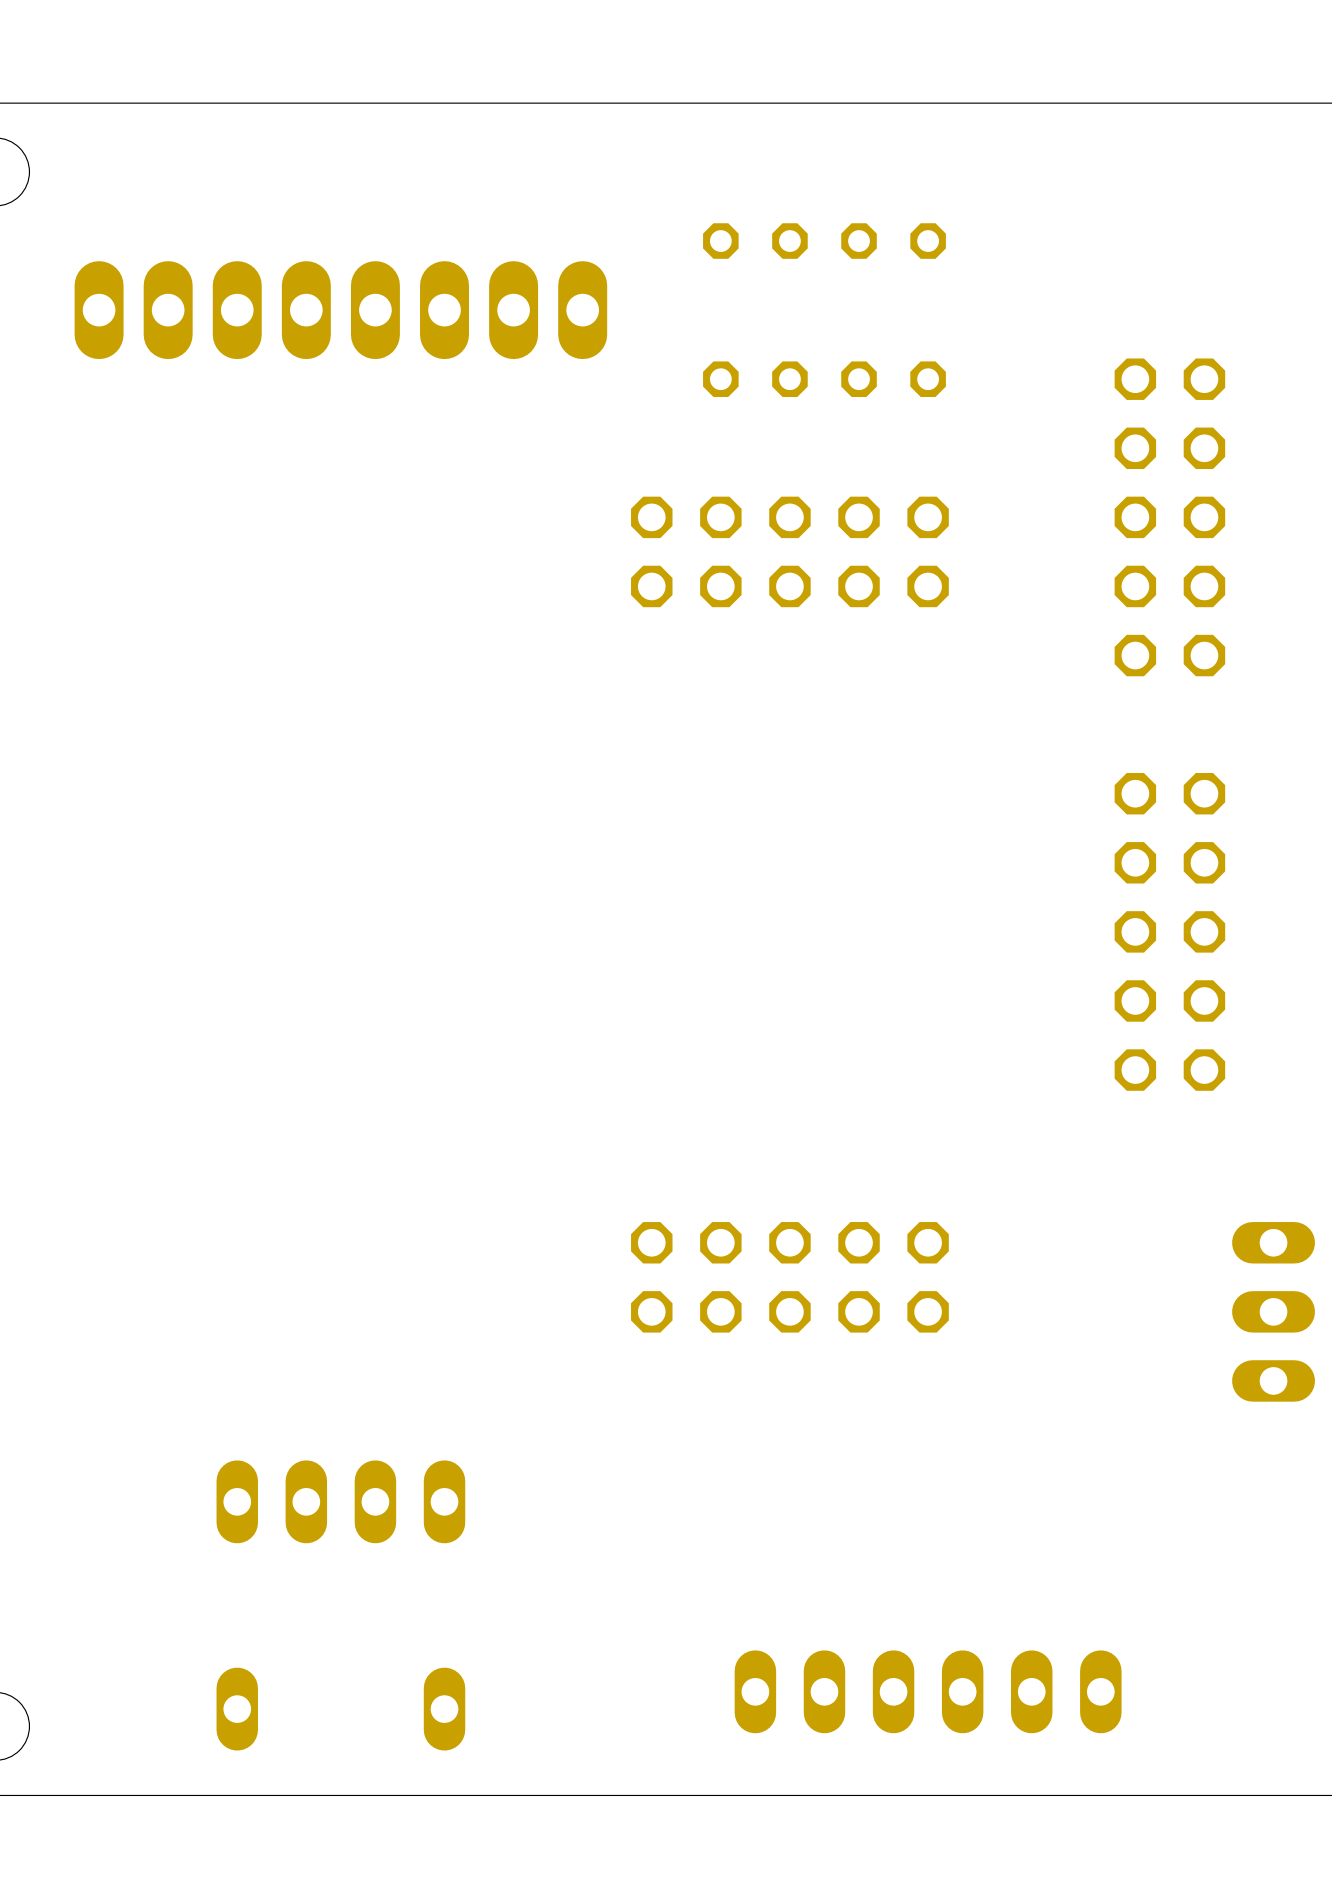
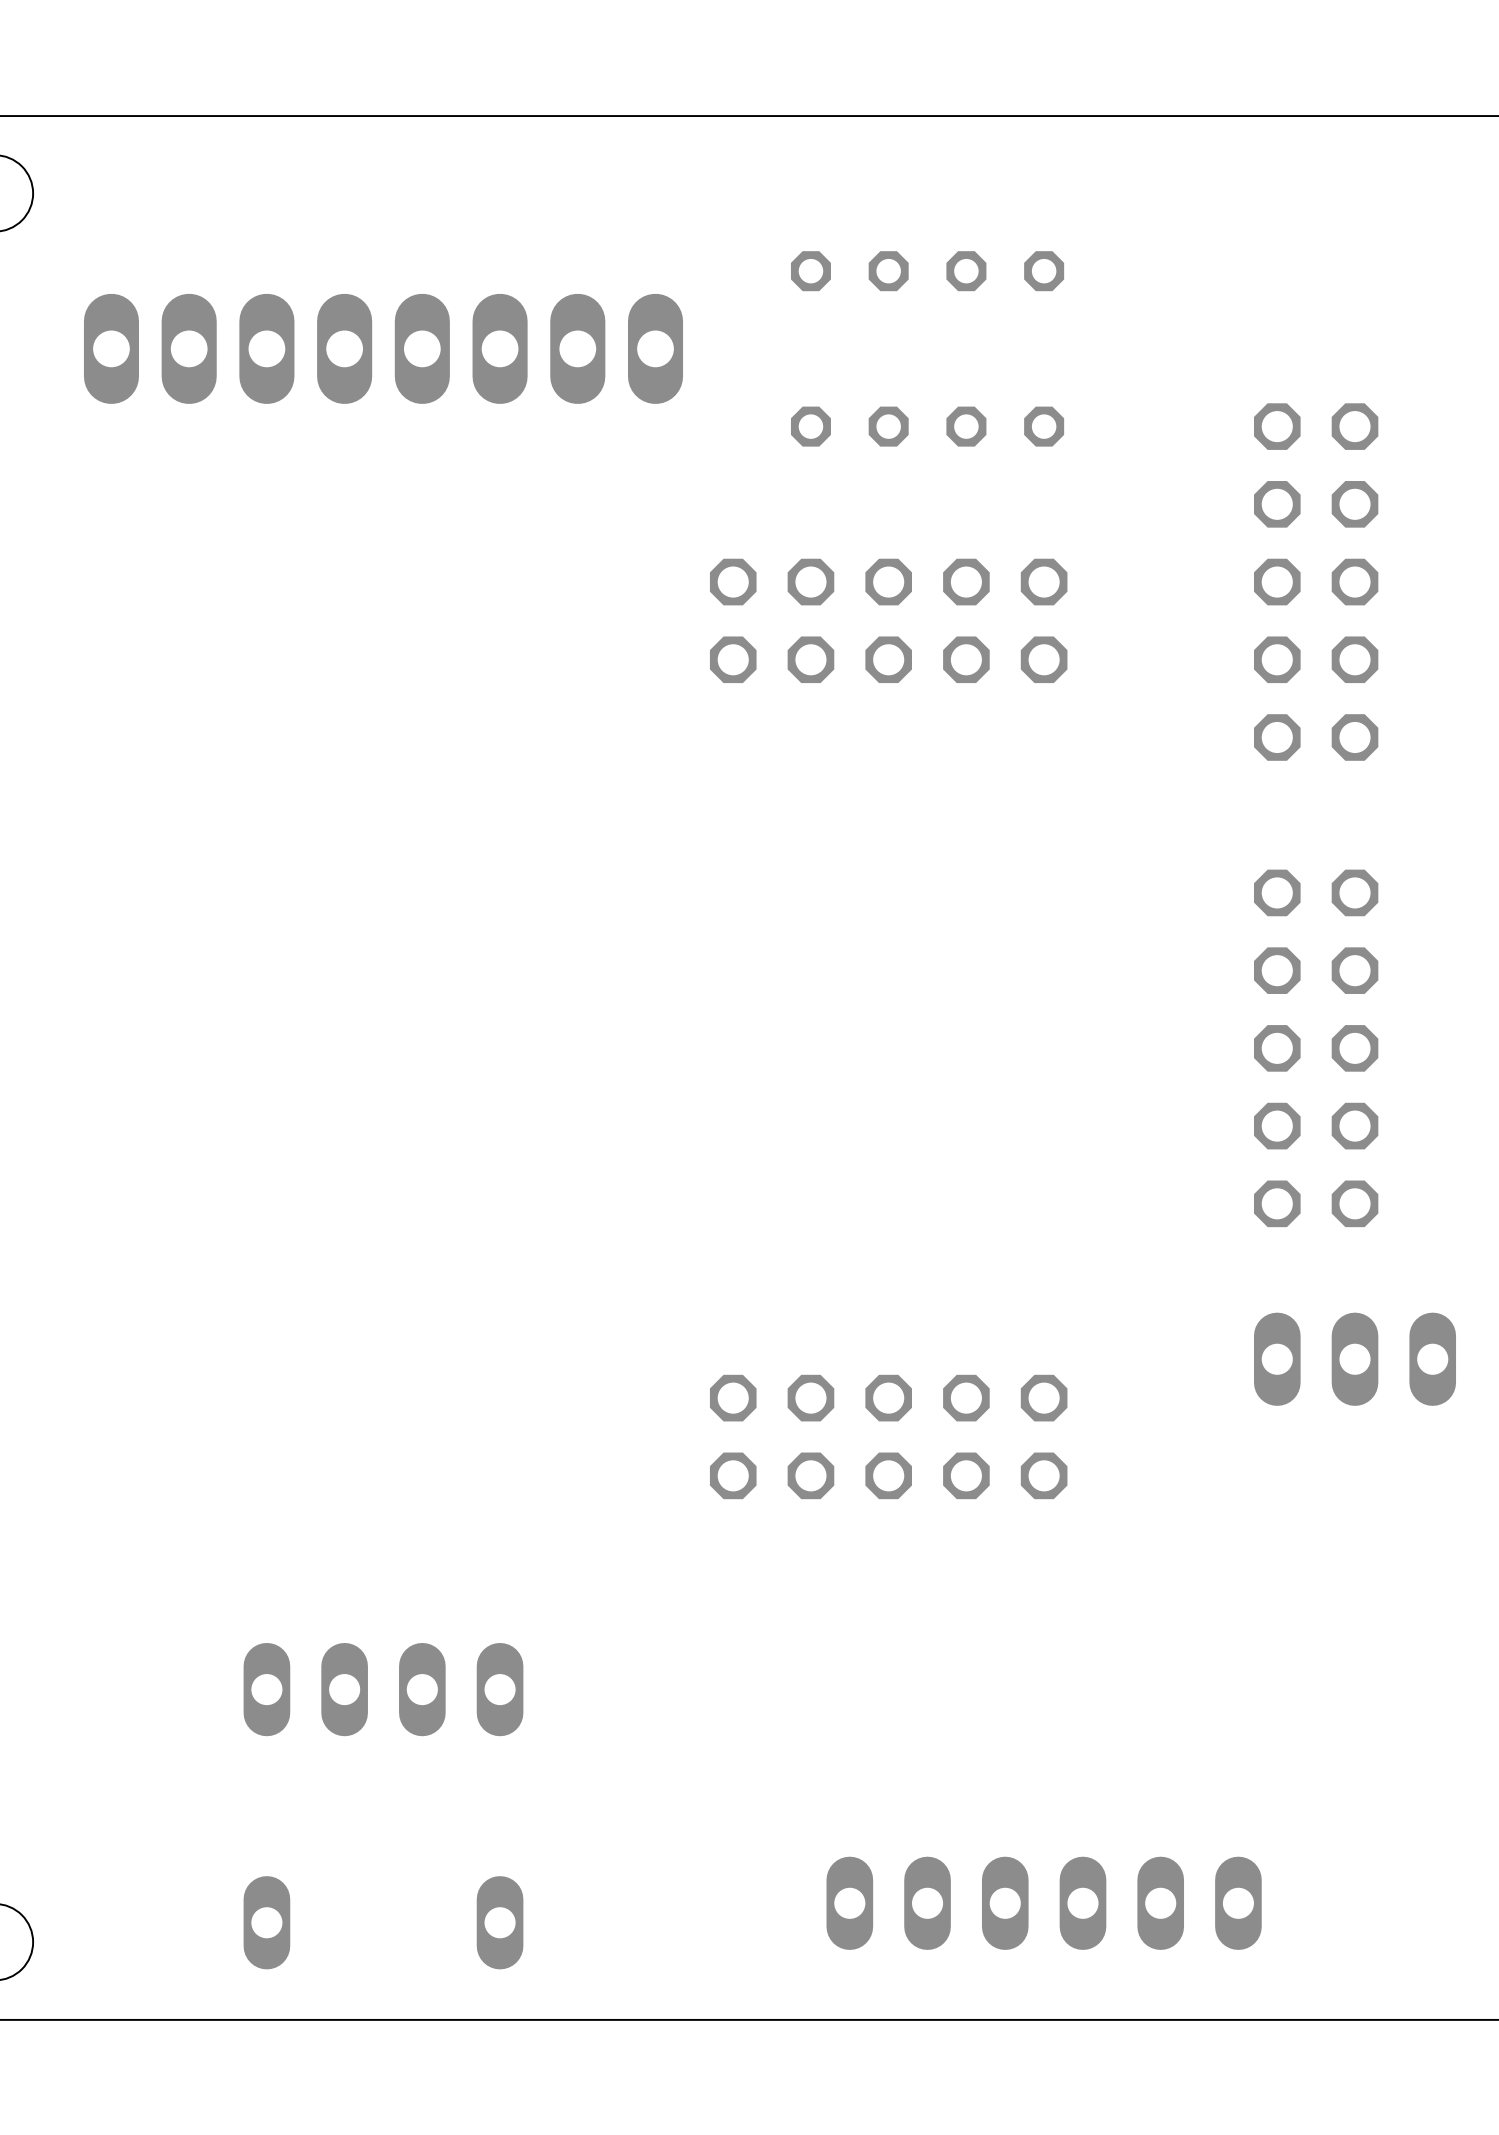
part rotation: 0° (1273, 1311) -> 90° clockwise (1355, 1359)
part position: (1273, 1311) -> (1355, 1359)

